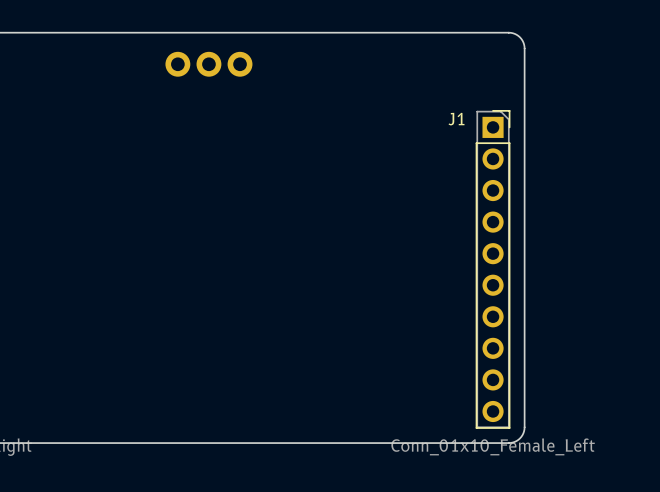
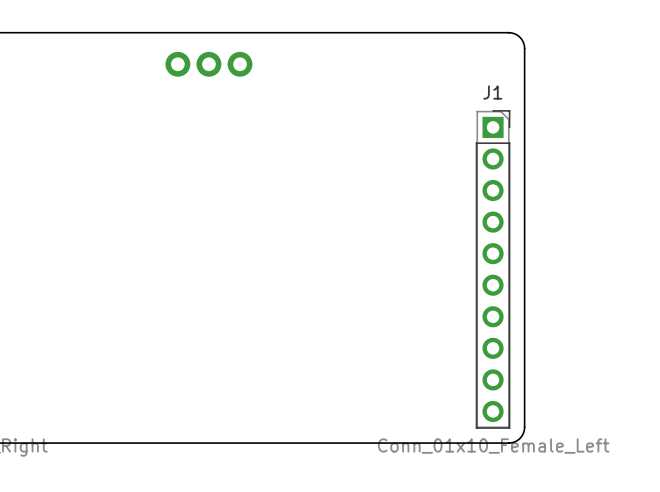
J1 name position: J1 (456, 119) -> J1 (492, 92)

